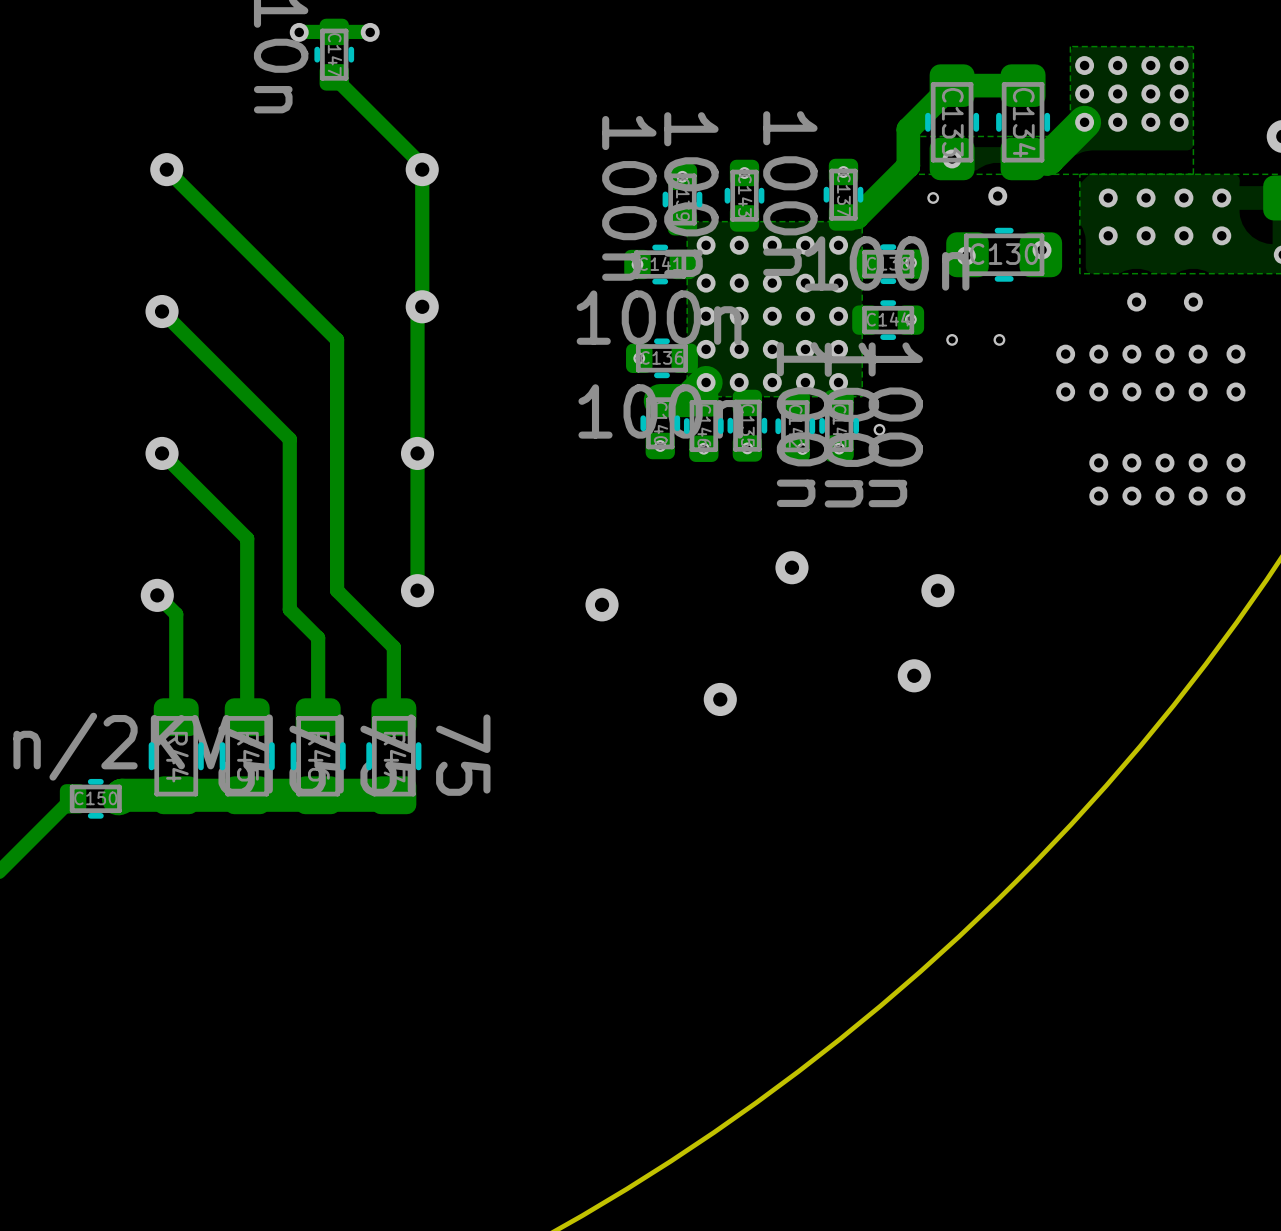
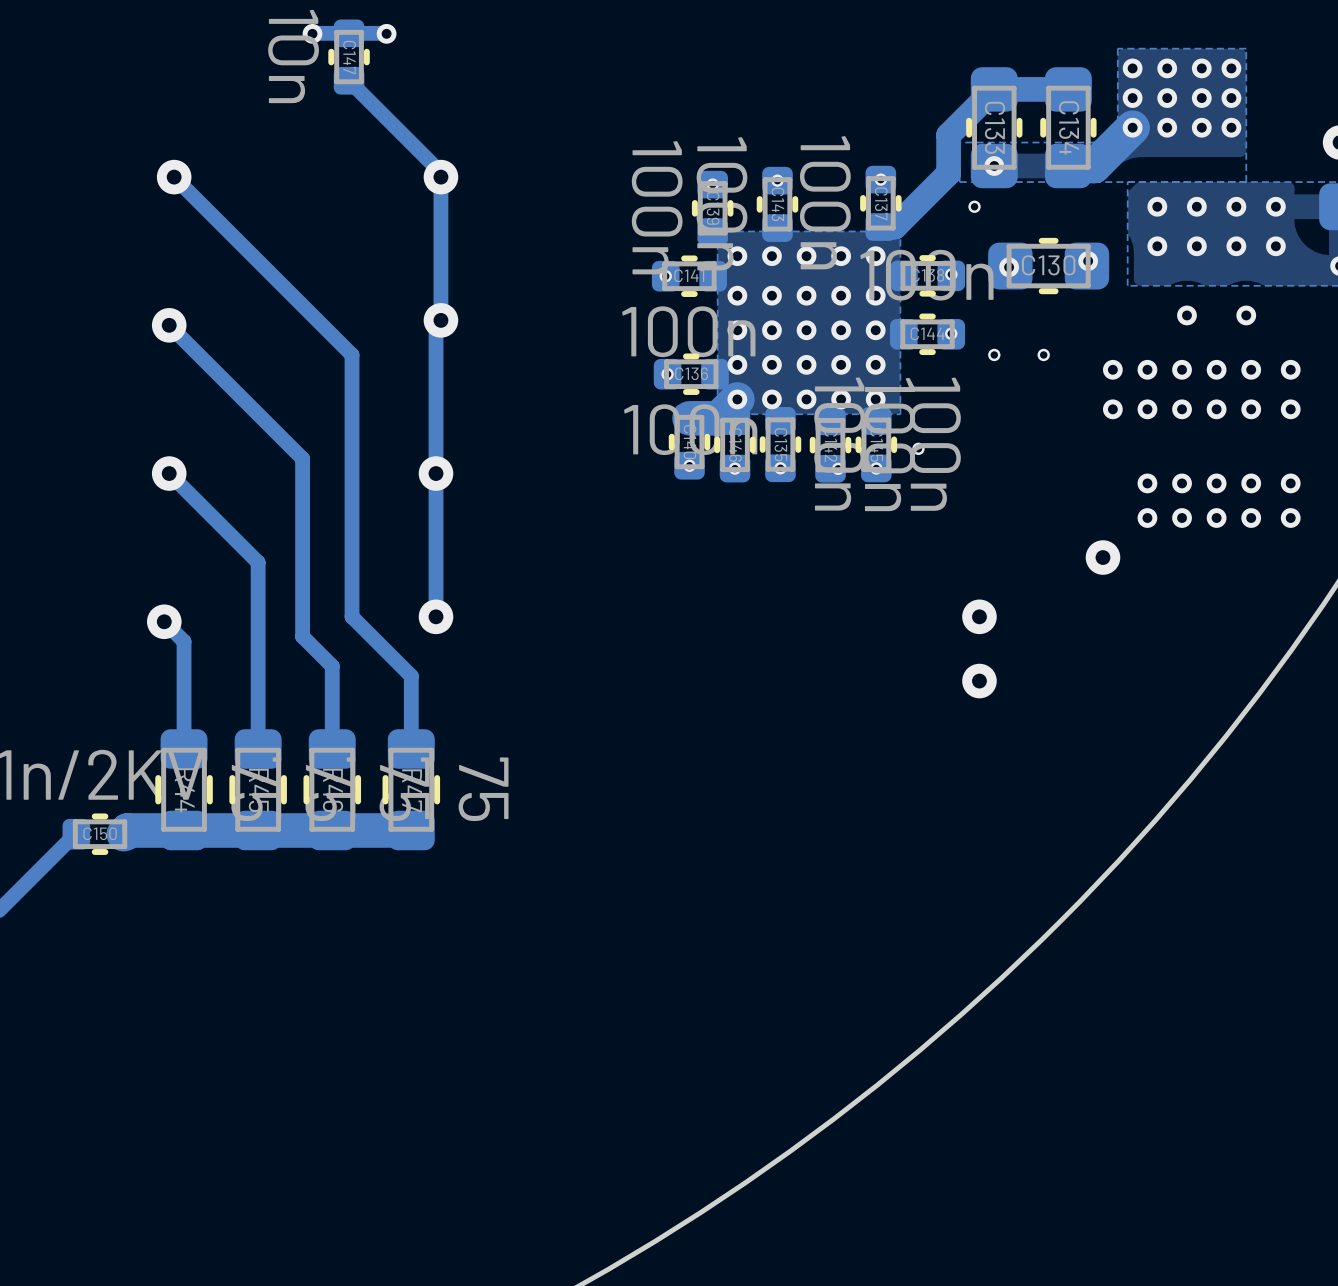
via: (997, 196) -> none
via: none -> (1102, 557)
via: (791, 567) -> none
via: (602, 604) -> none
via position: (914, 675) -> (979, 681)
via: (720, 699) -> none

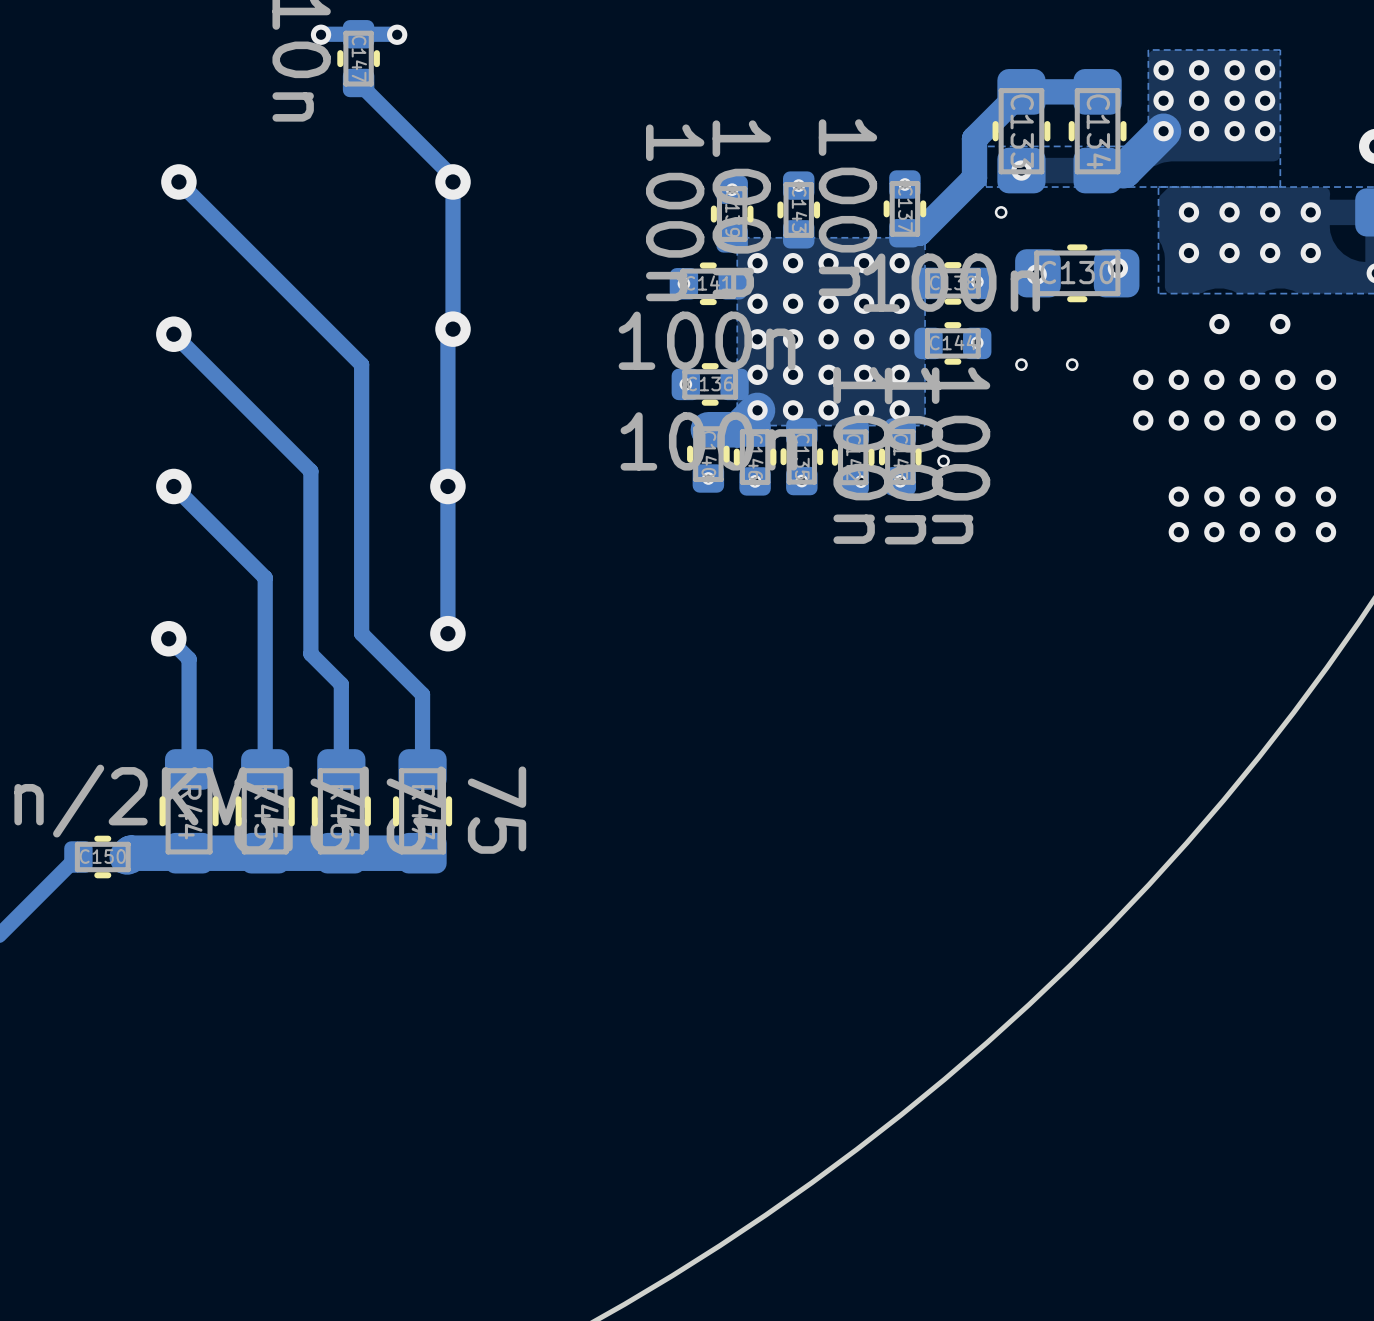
via: (1102, 557) -> none
via: (979, 616) -> none
via: (979, 681) -> none

